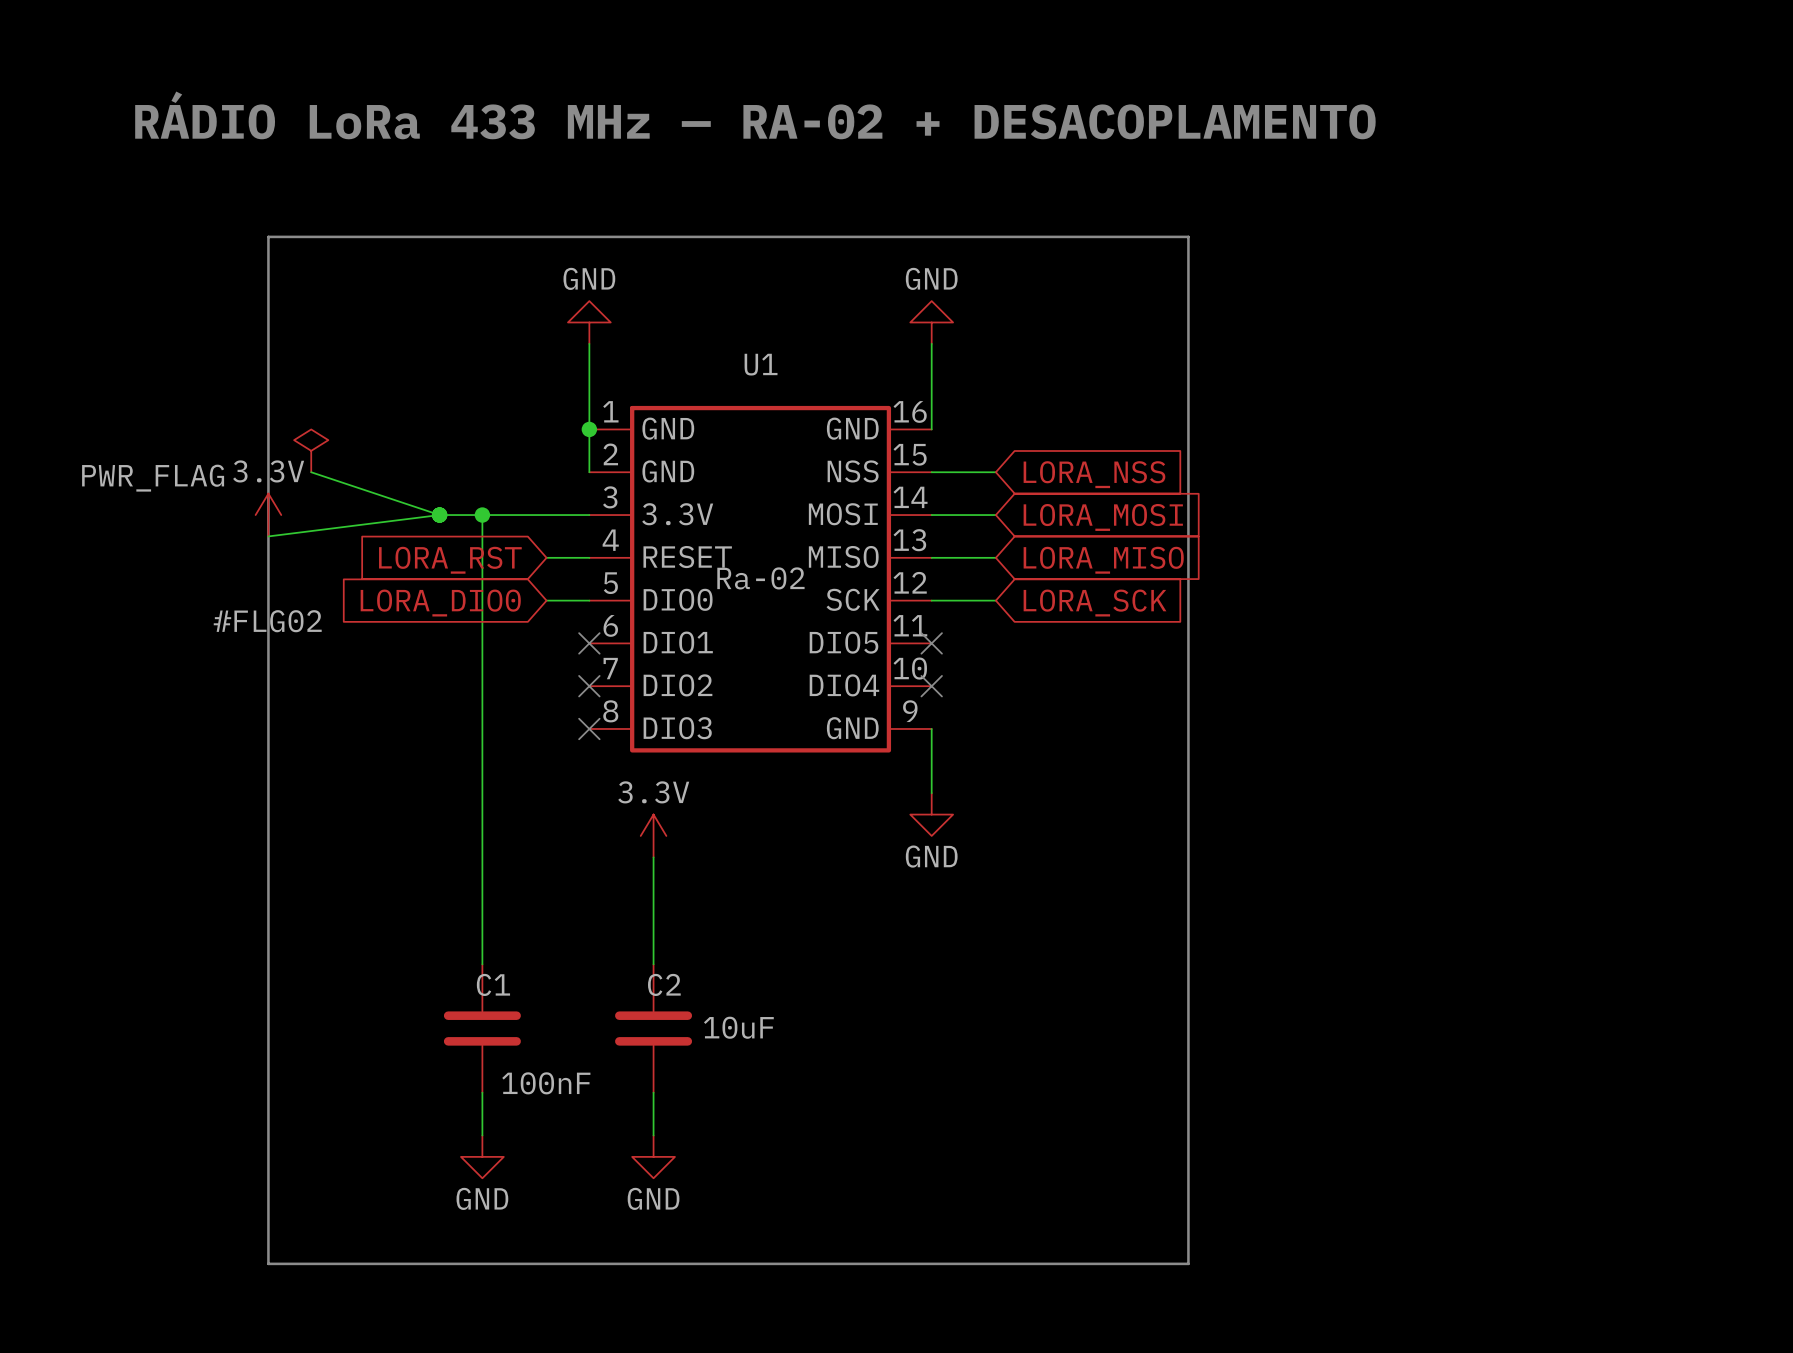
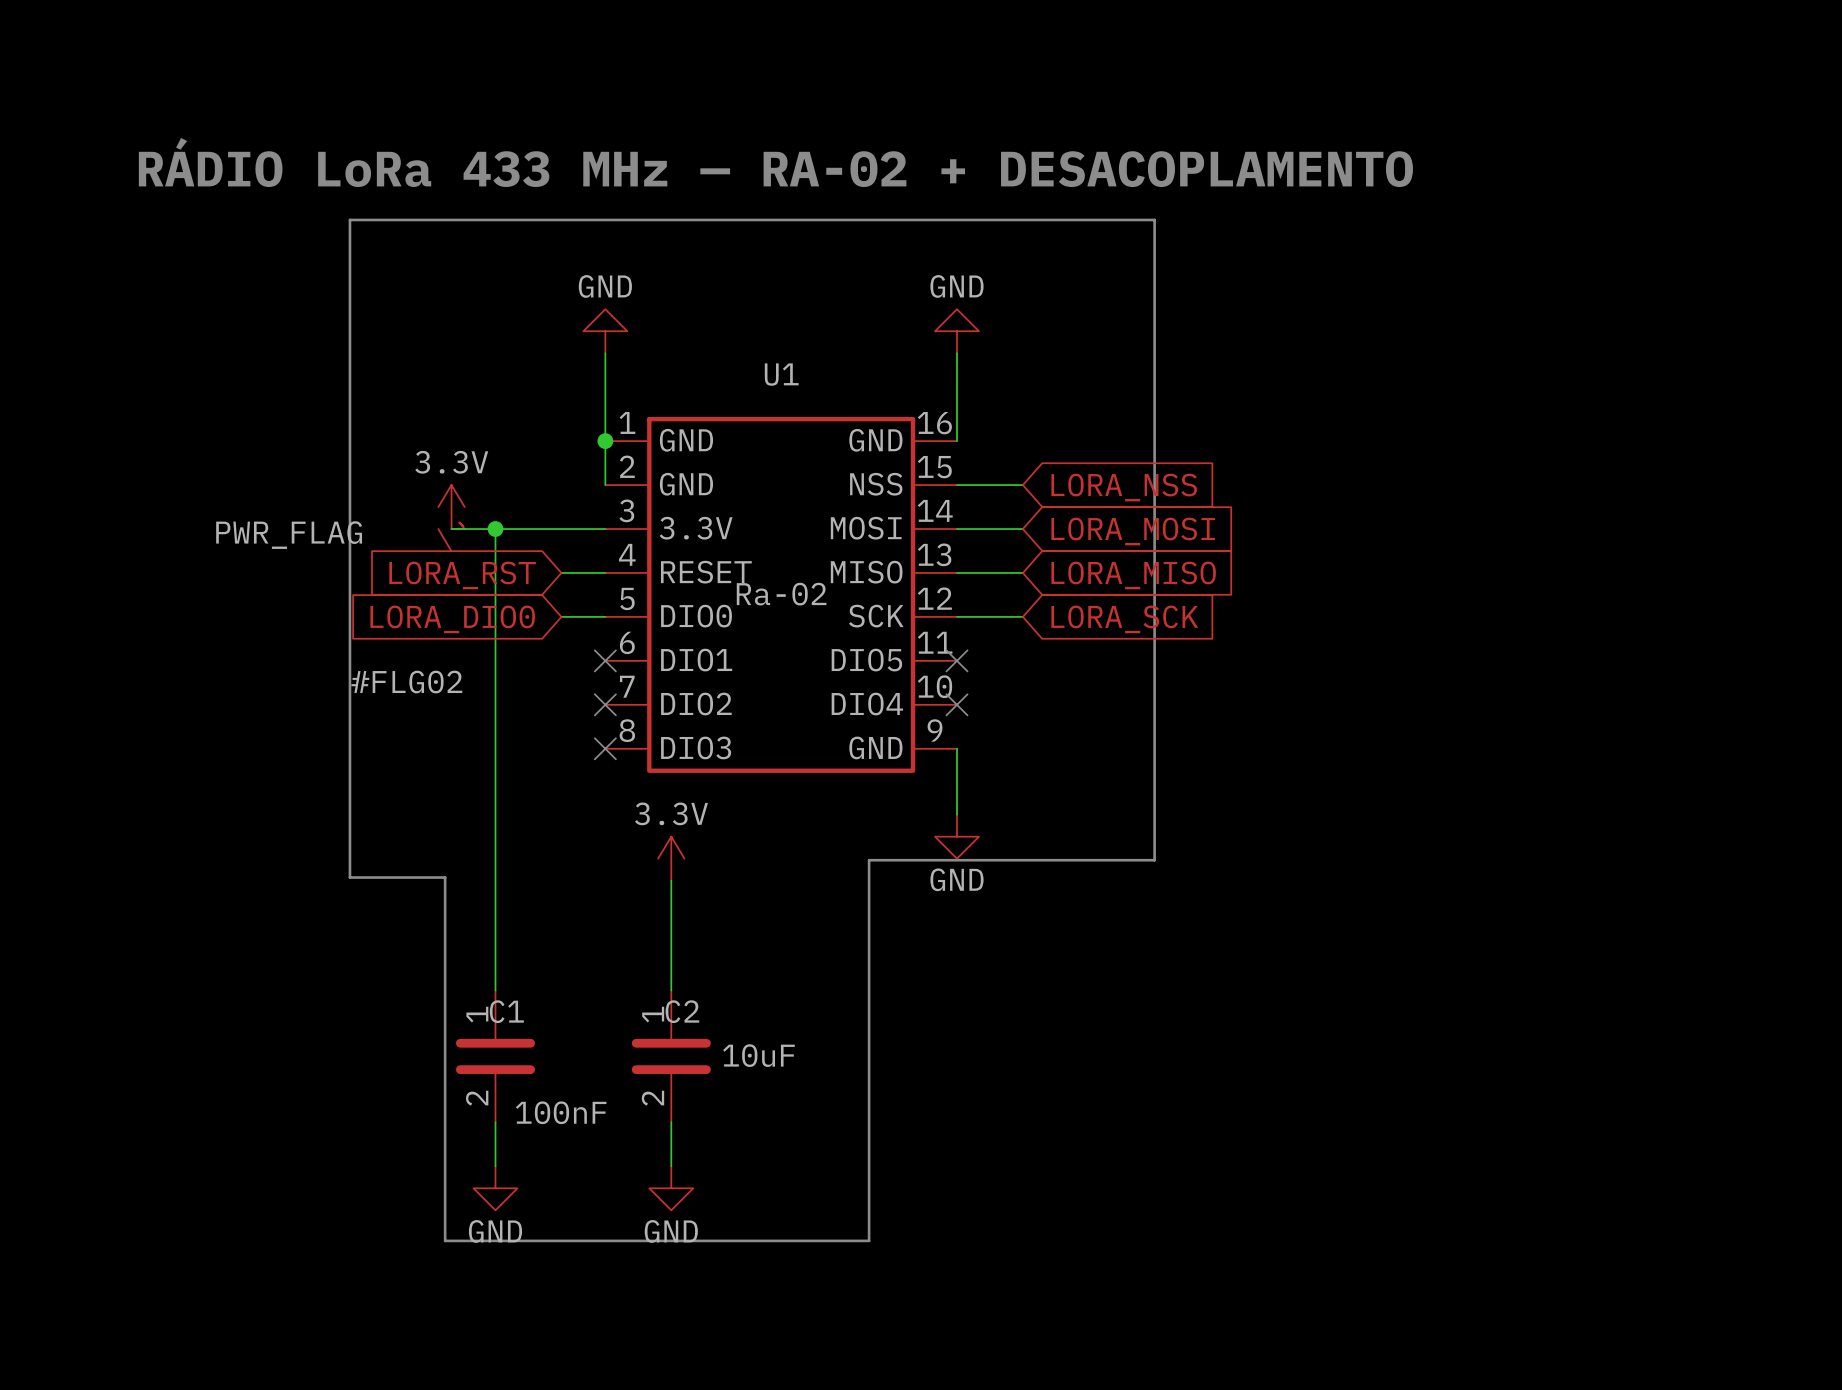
text position: RÁDIO LoRa 433 MHz — RA-02 + DESACOPLAMENTO (755, 115) -> RÁDIO LoRa 433 MHz — RA-02 + DESACOPLAMENTO (775, 162)
line: (268, 236) (1188, 236) (1188, 1263) (268, 1263) (268, 236) -> (349, 219) (349, 877) (445, 877) (445, 1240) (869, 1240) (869, 860) (1154, 860) (1154, 219) (349, 219)
#FLG02 shape: [294, 429, 329, 473] -> [438, 521, 466, 552]
wire: (311, 472) (439, 515) (268, 536) -> none
power symbol position: 3.3V (268, 515) -> 3.3V (451, 507)
junction: (439, 515) -> none
C1 pin number: none -> 1 (477, 1014)
C2 pin number: none -> 1 (653, 1014)
C1 pin number: none -> 2 (477, 1098)
C2 pin number: none -> 2 (652, 1098)

